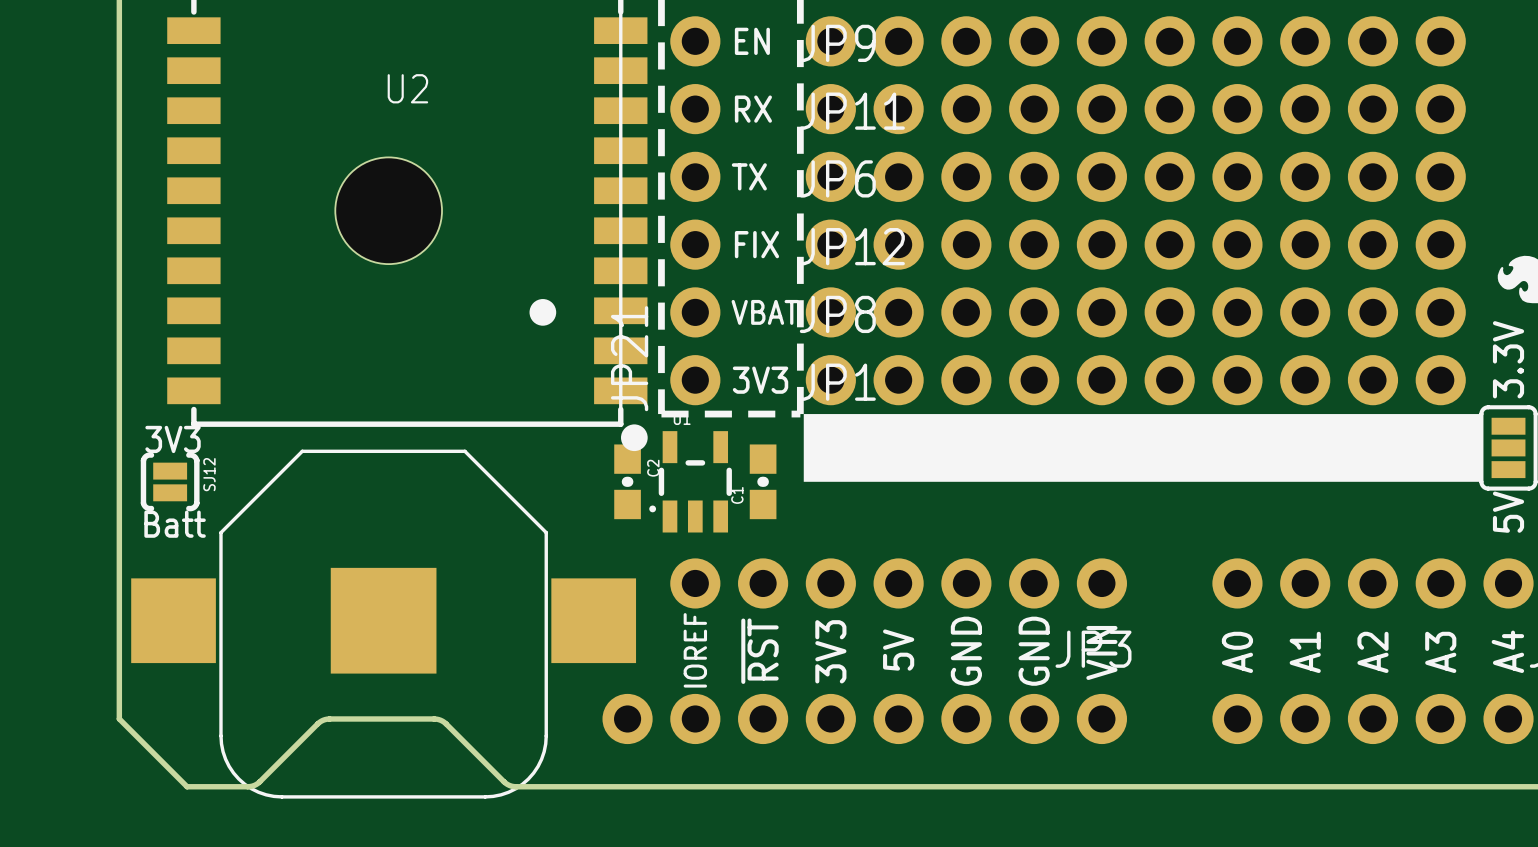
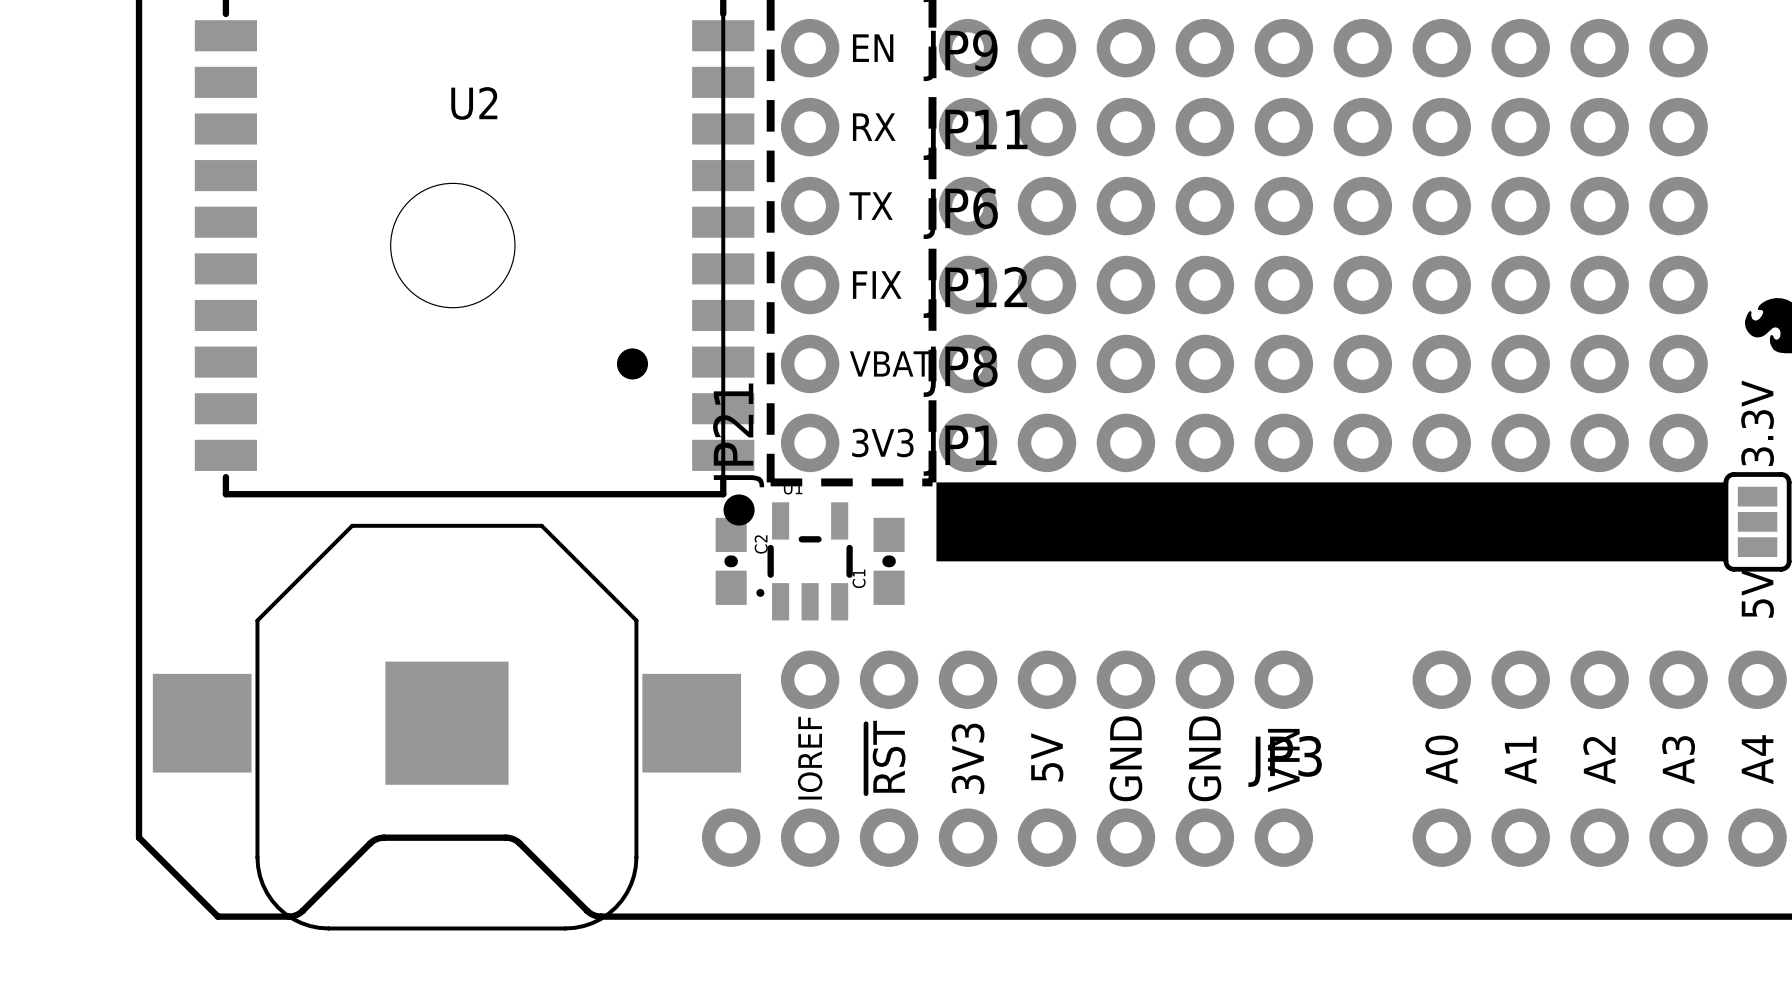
text: 3V3 (173, 439) -> none
SJ12: (170, 481) -> none
text: Batt (175, 524) -> none

